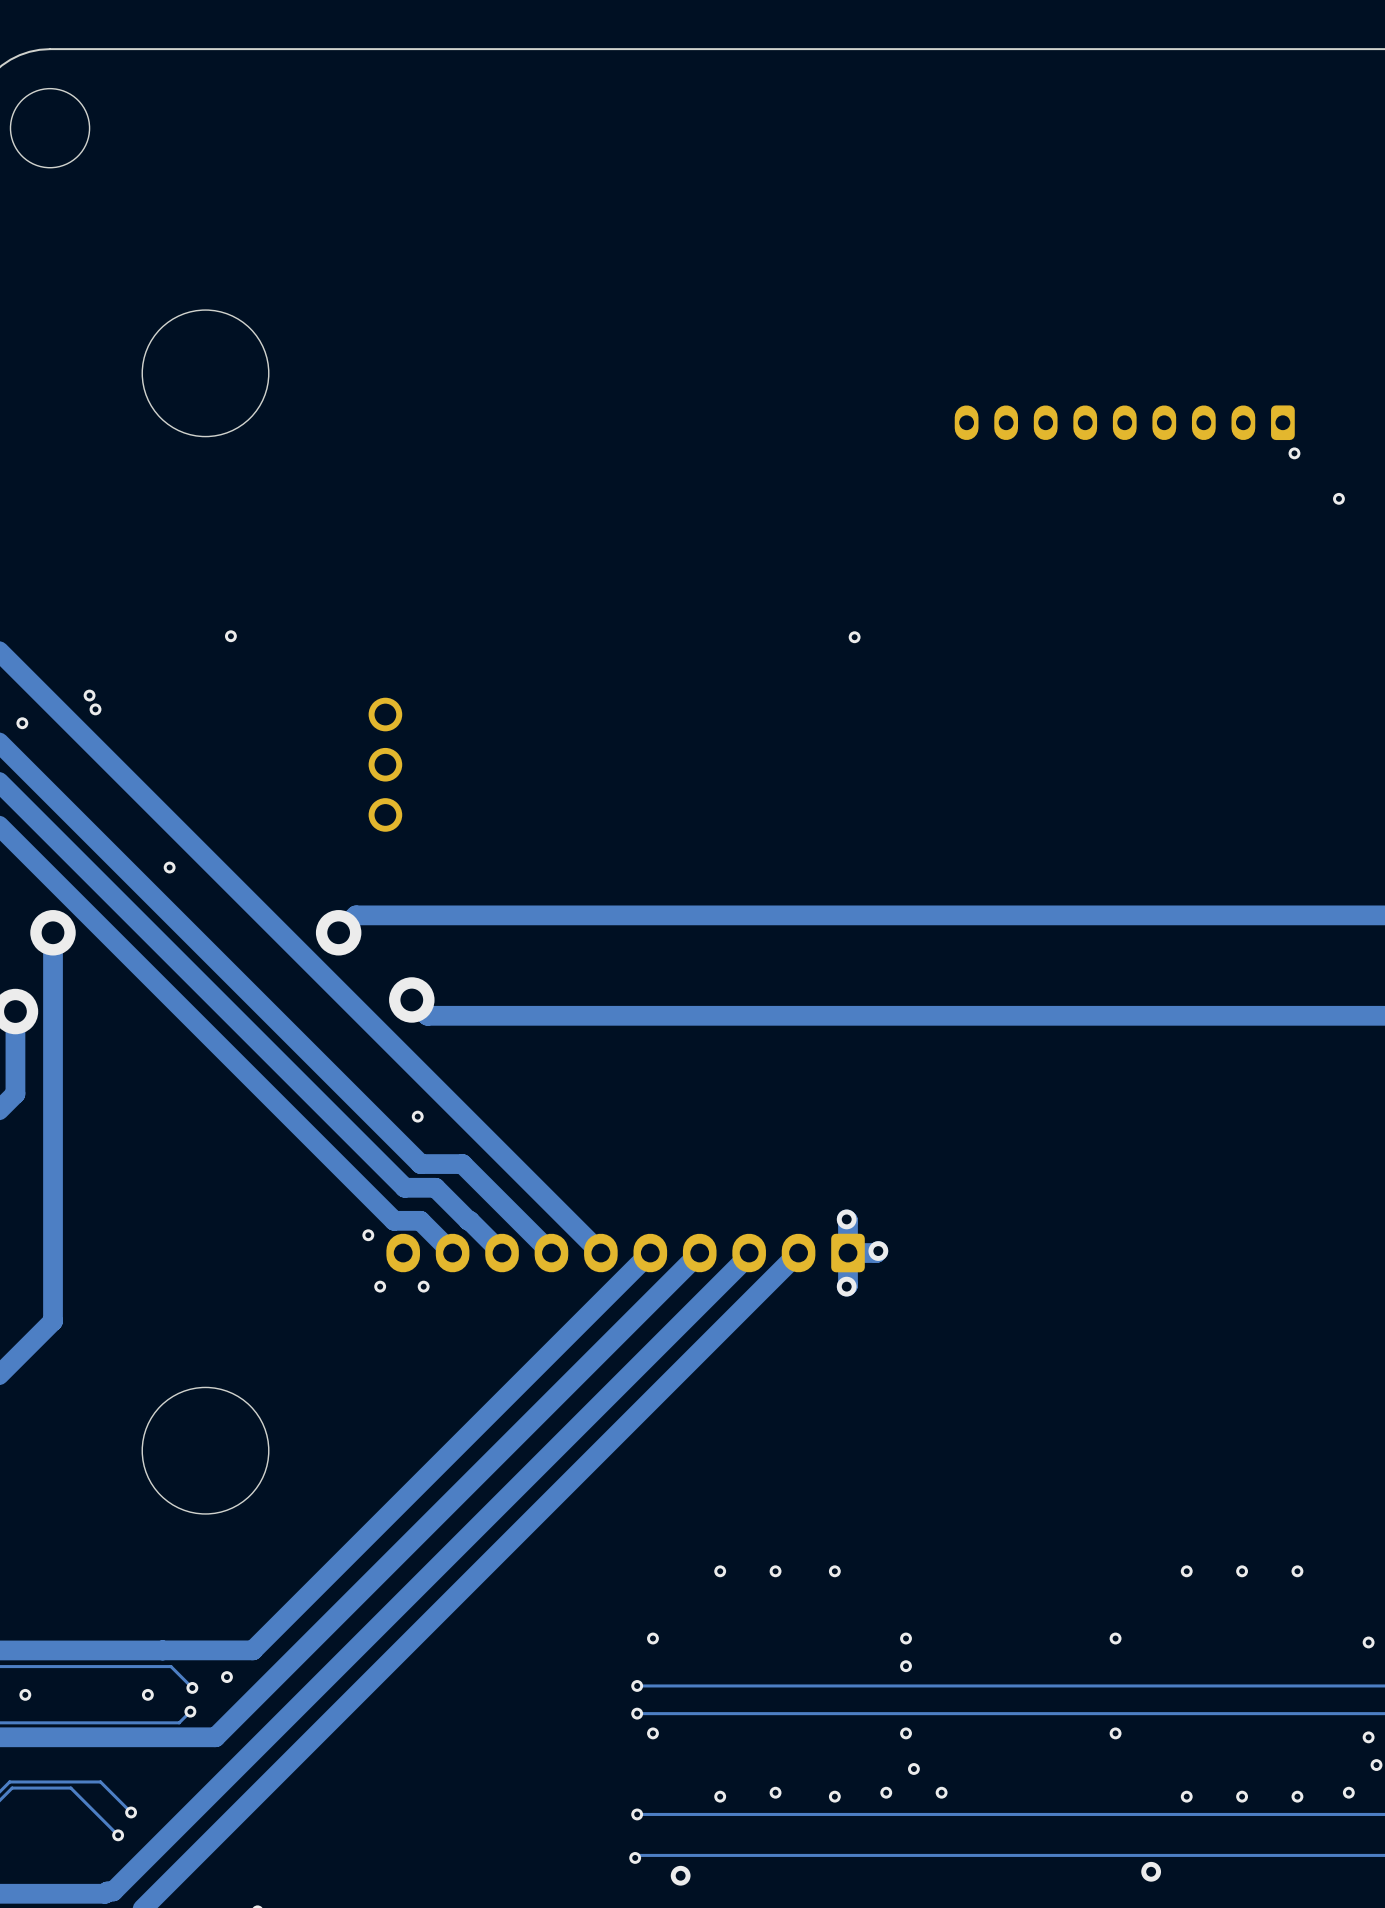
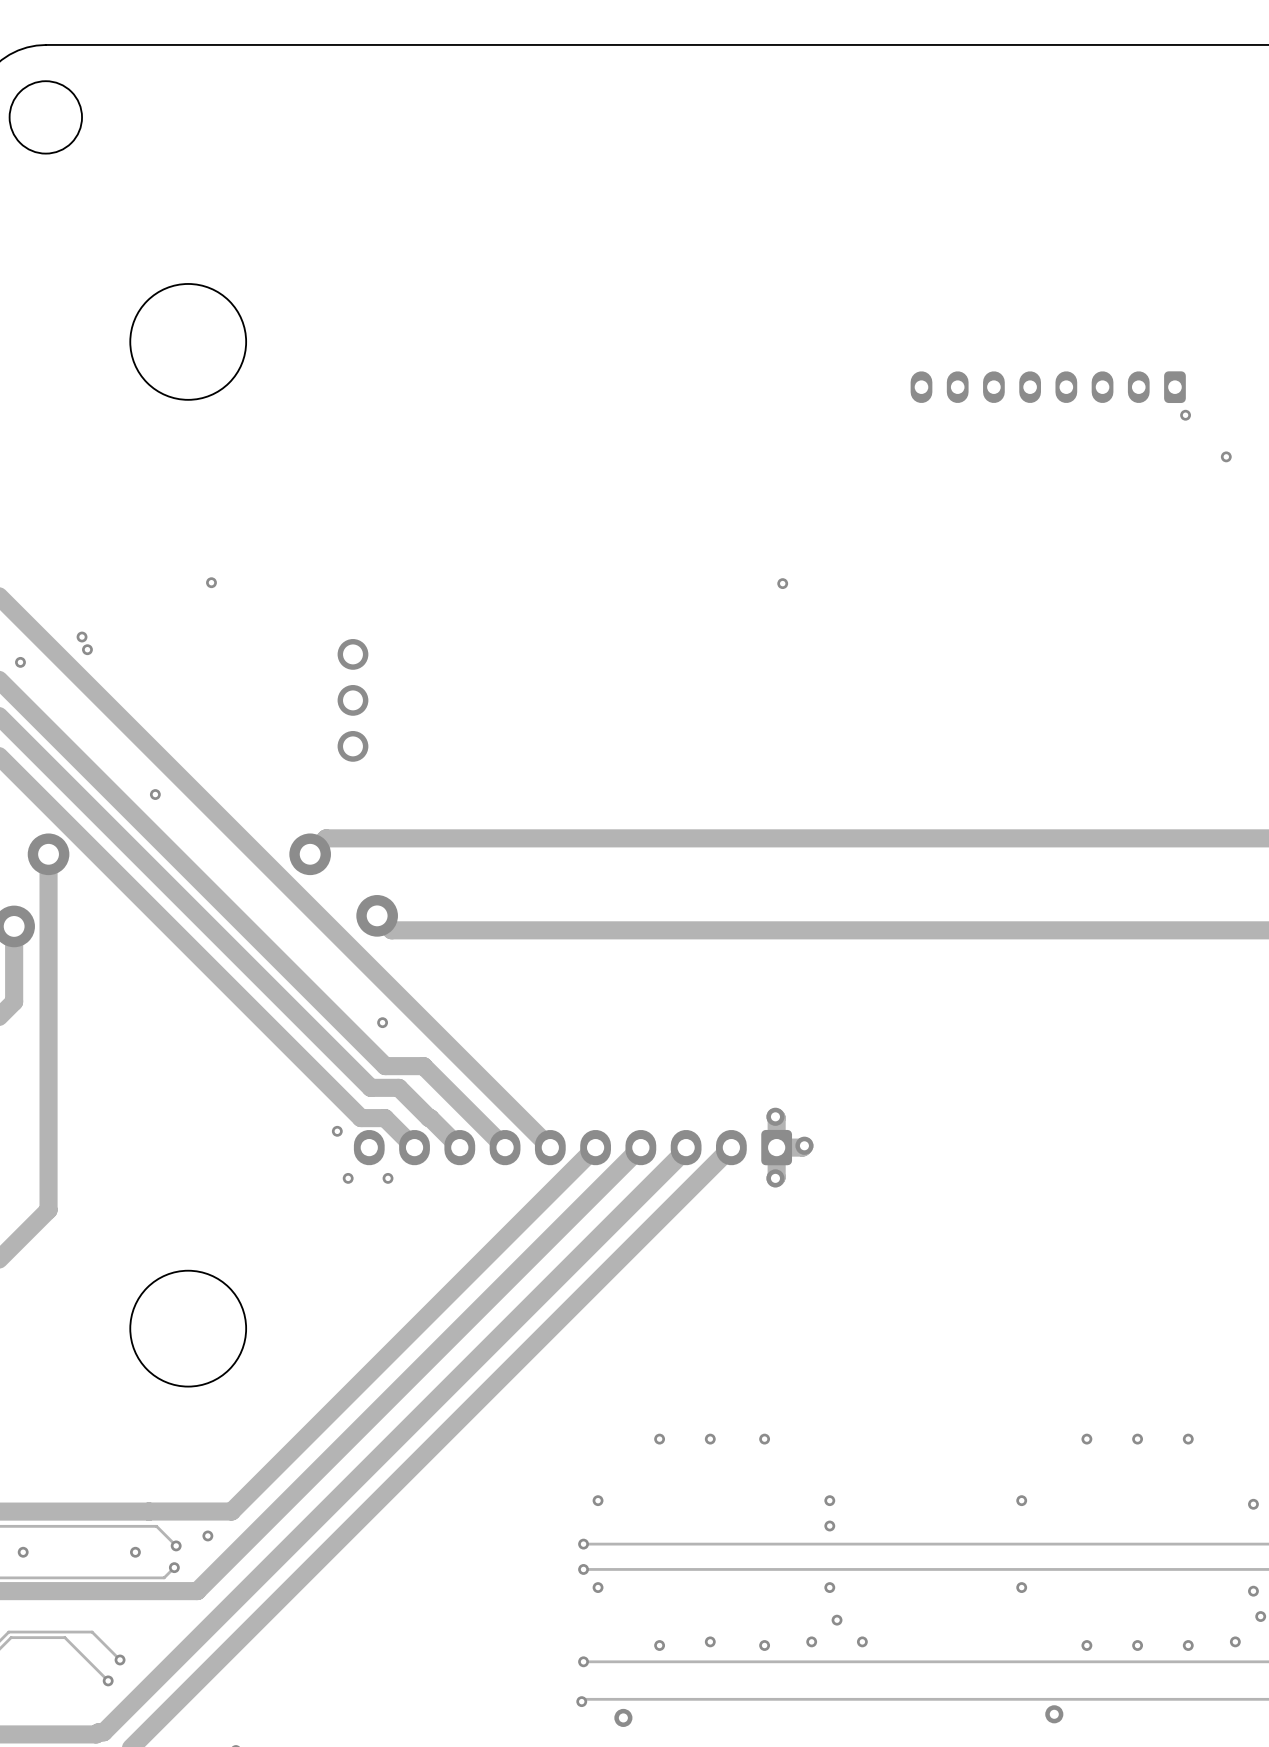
part footprint: [954, 405, 1295, 441] -> [910, 371, 1186, 404]

